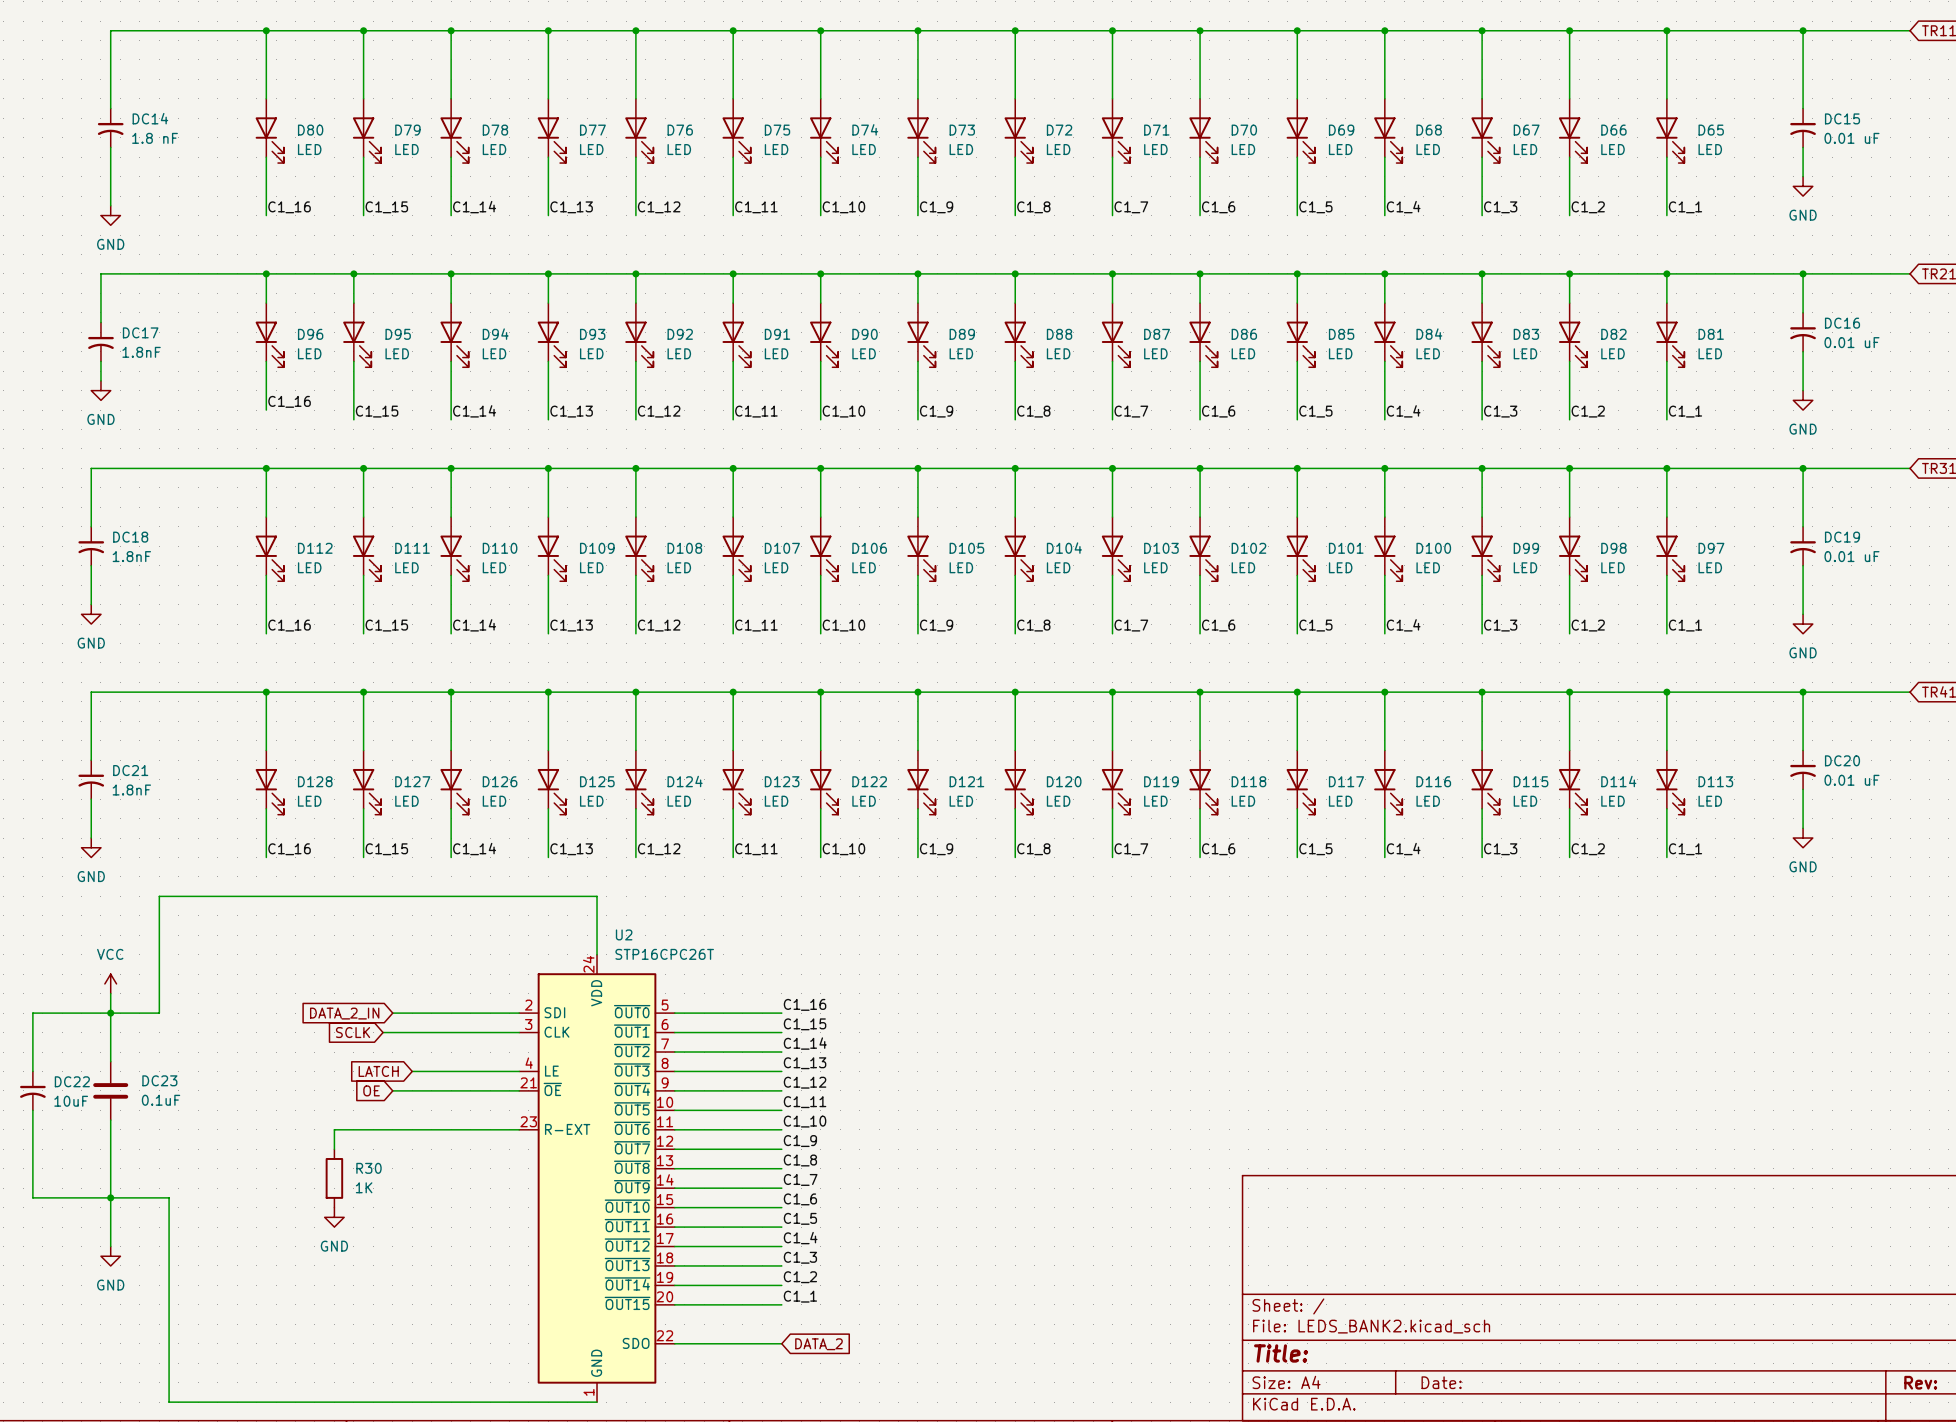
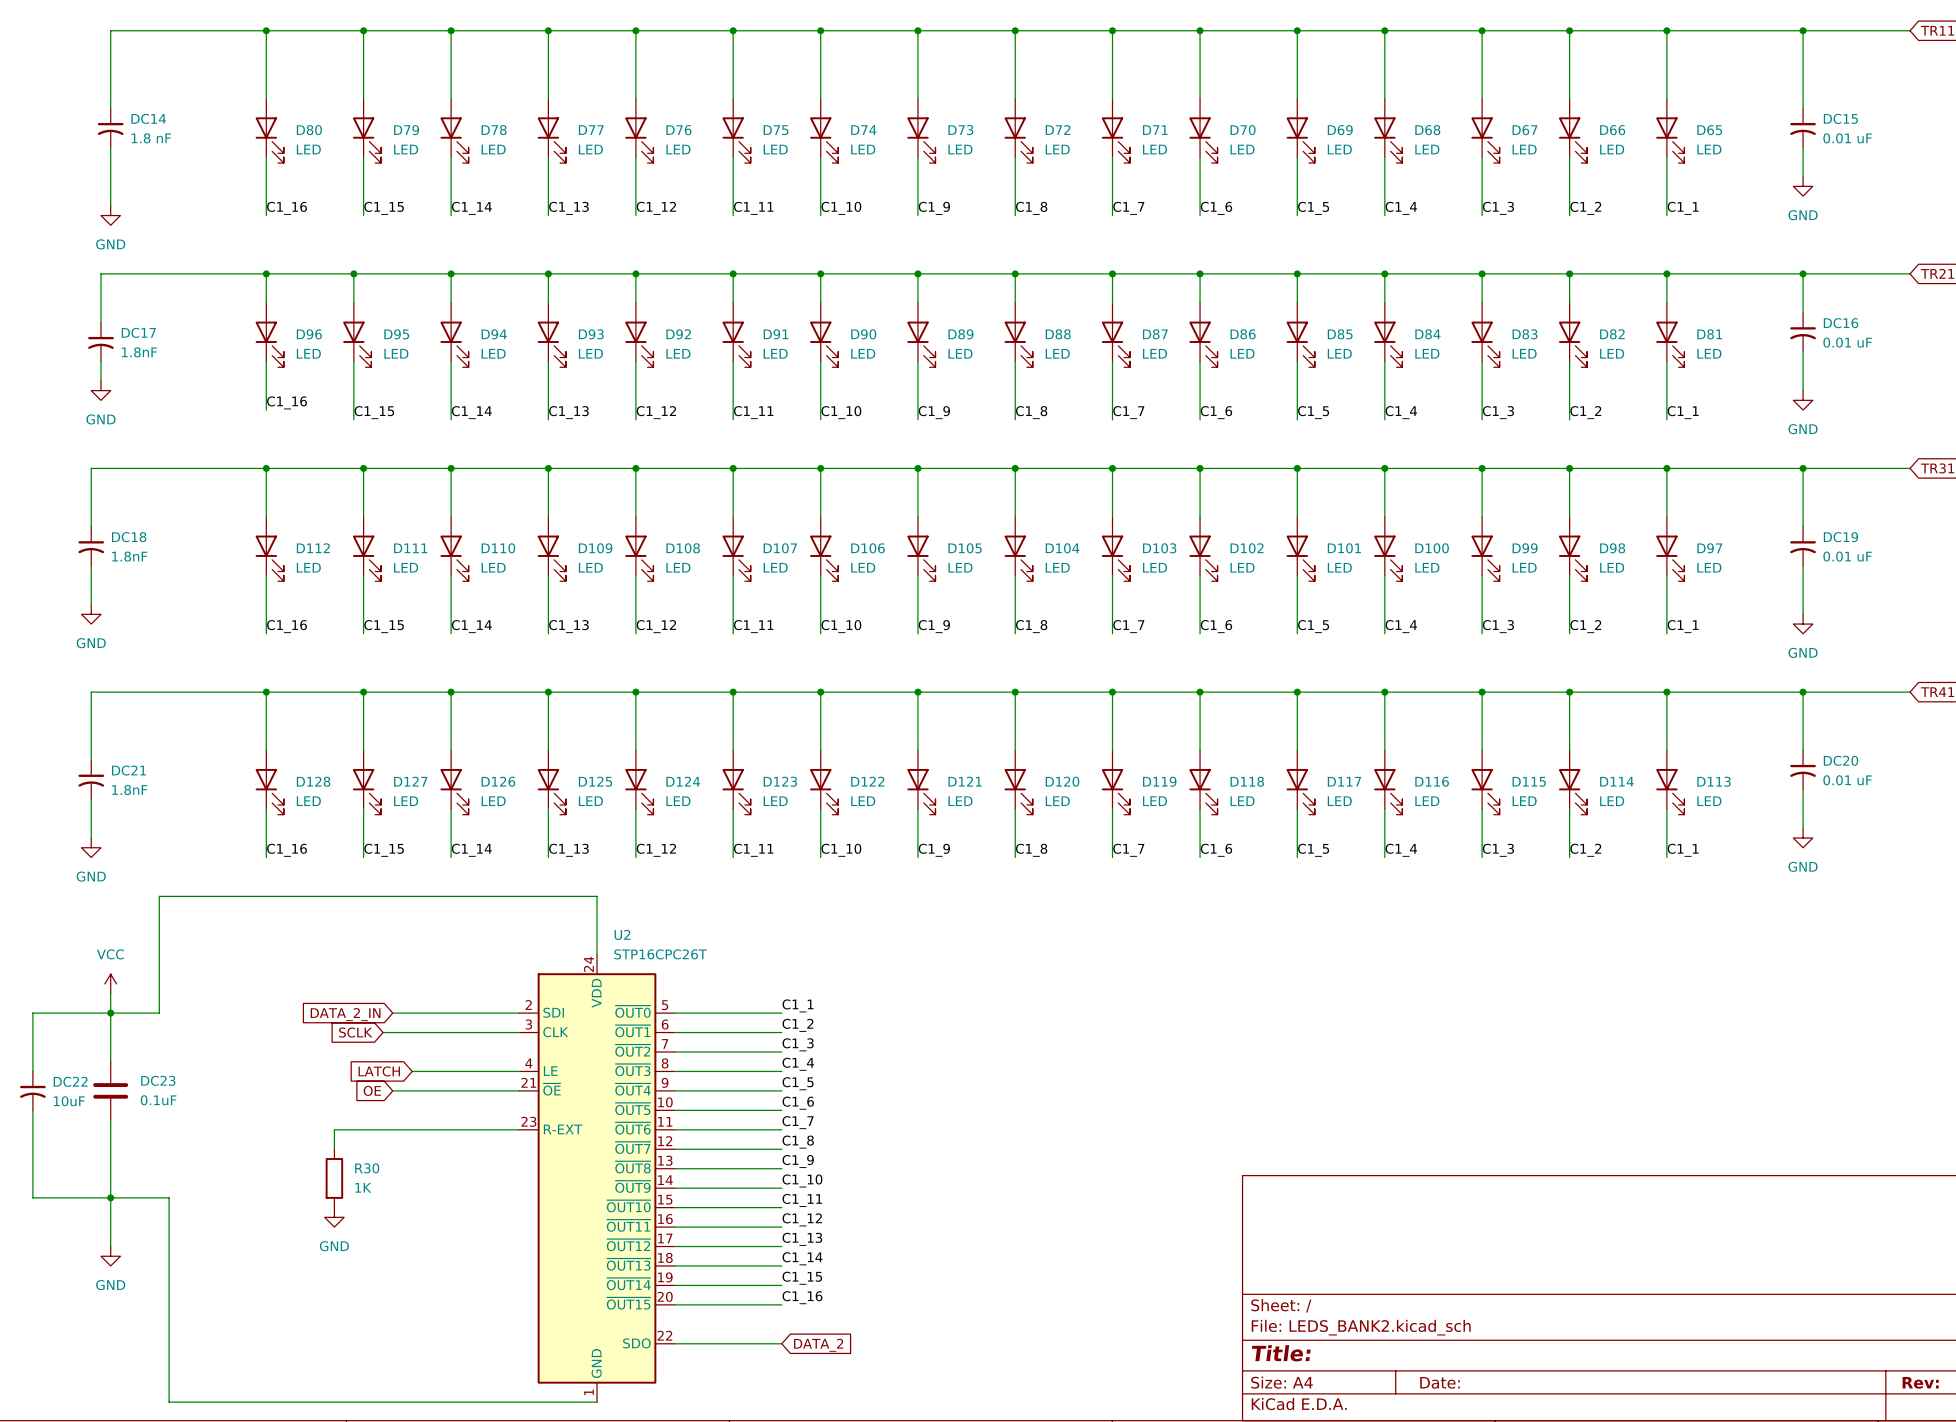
label: C1_16 (805, 1004) -> C1_1 (798, 1005)
label: C1_15 (805, 1024) -> C1_2 (797, 1025)
label: C1_14 (805, 1043) -> C1_3 (798, 1044)
label: C1_13 (805, 1063) -> C1_4 (798, 1064)
label: C1_12 (805, 1082) -> C1_5 (798, 1083)
label: C1_11 (805, 1102) -> C1_6 (798, 1103)
label: C1_10 (805, 1121) -> C1_7 (798, 1122)
label: C1_9 (800, 1141) -> C1_8 (798, 1142)
label: C1_8 (800, 1160) -> C1_9 (798, 1161)
label: C1_7 (800, 1179) -> C1_10 (802, 1180)
label: C1_6 (800, 1199) -> C1_11 (802, 1200)
label: C1_5 (800, 1218) -> C1_12 (802, 1219)
label: C1_4 (800, 1238) -> C1_13 (802, 1239)
label: C1_3 (800, 1257) -> C1_14 (802, 1258)
label: C1_2 (800, 1277) -> C1_15 (802, 1278)
label: C1_1 (800, 1296) -> C1_16 (802, 1297)

